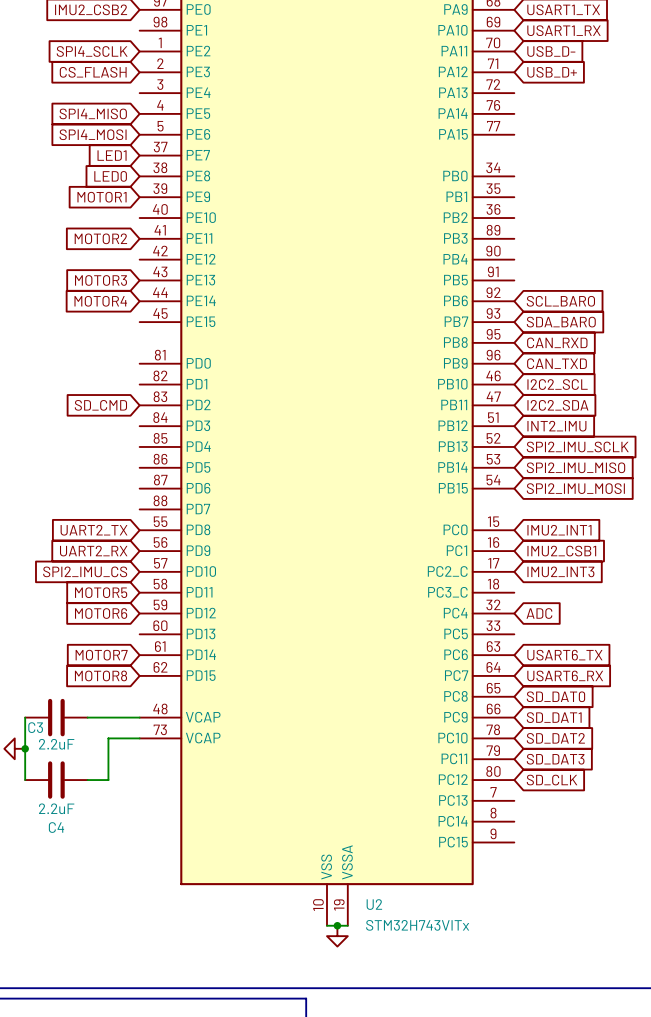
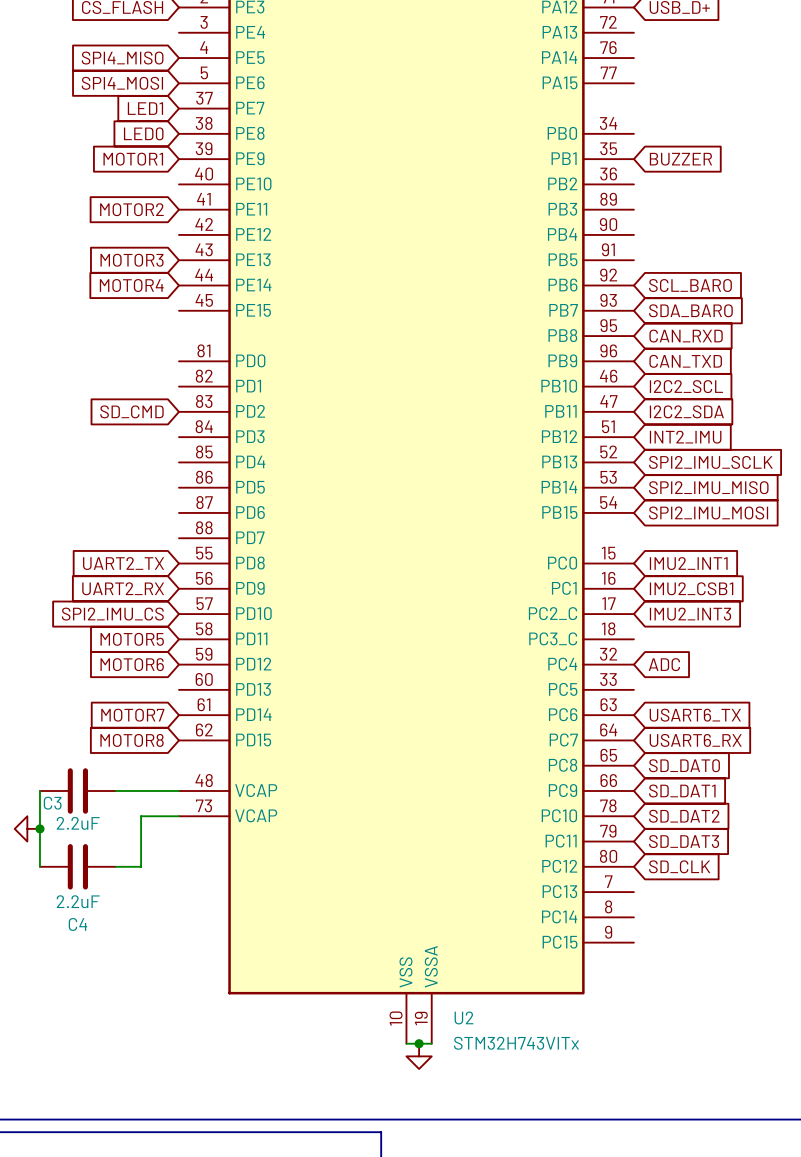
global label: none -> BUZZER (680, 159)

